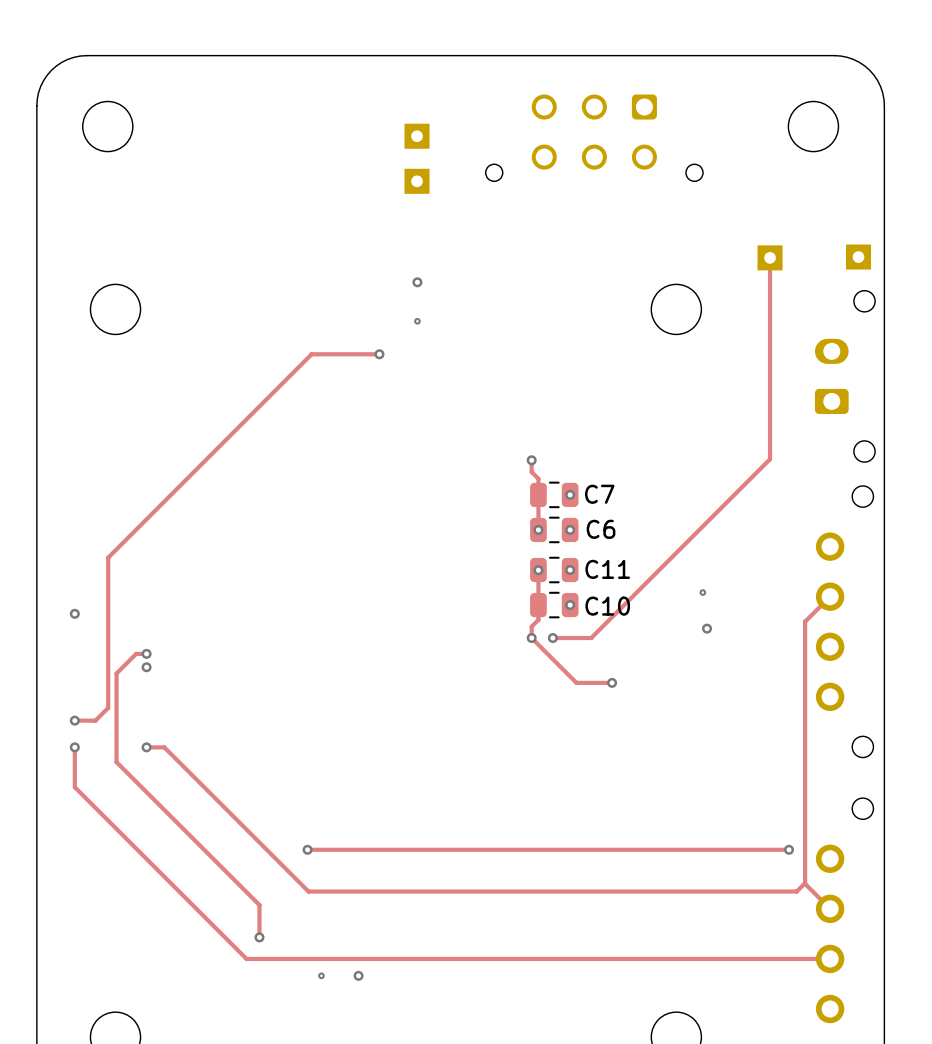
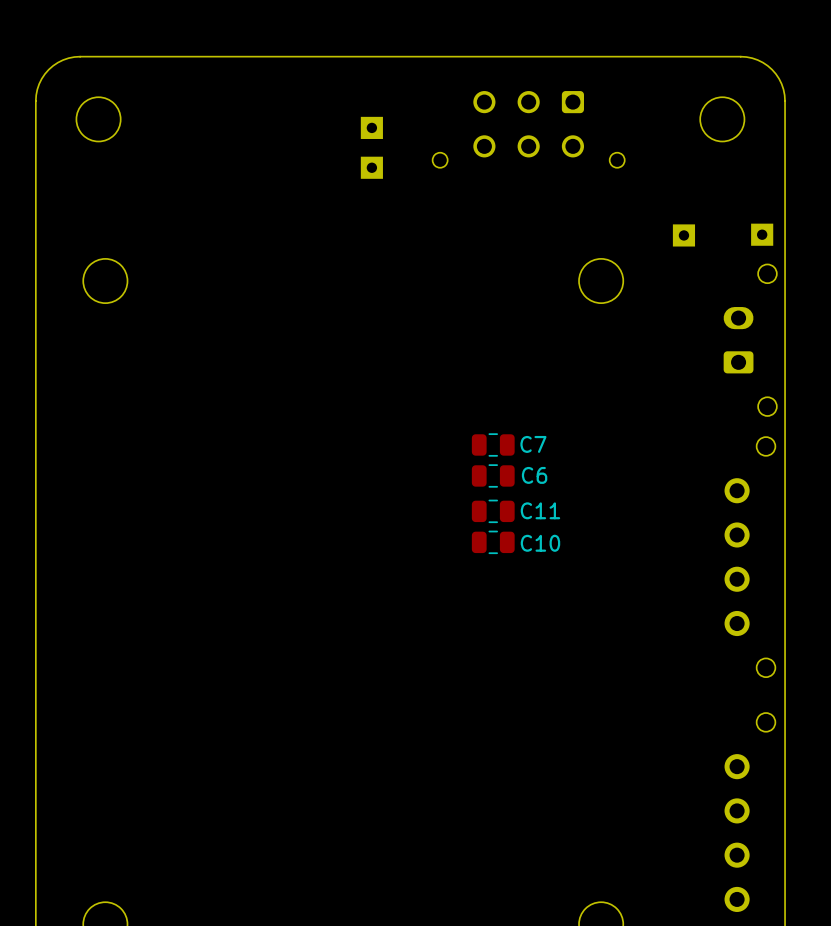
track: (770, 257) (770, 459) (591, 638) (552, 638) -> none
via: (417, 282) -> none
via: (417, 321) -> none
track: (379, 354) (311, 354) (108, 557) (108, 707) (95, 720) (74, 720) -> none
via: (379, 354) -> none
track: (531, 460) (531, 472) (538, 478) (538, 529) -> none
via: (531, 460) -> none
via: (570, 494) -> none
via: (538, 529) -> none
via: (570, 529) -> none
track: (538, 570) (538, 619) (531, 626) (531, 638) (576, 682) (612, 682) -> none
via: (538, 570) -> none
via: (570, 570) -> none
via: (702, 592) -> none
track: (830, 596) (805, 621) (805, 883) -> none
via: (570, 605) -> none
via: (74, 613) -> none
via: (707, 628) -> none
via: (531, 638) -> none
via: (552, 638) -> none
track: (146, 653) (136, 653) (116, 673) (116, 762) (259, 905) (259, 937) -> none
via: (146, 653) -> none
via: (146, 667) -> none
via: (612, 682) -> none
via: (74, 720) -> none
track: (74, 747) (74, 787) (246, 958) (830, 958) -> none
via: (74, 747) -> none
track: (146, 747) (164, 747) (308, 891) (796, 891) (805, 883) -> none
via: (146, 747) -> none
track: (307, 849) (789, 849) -> none
via: (307, 849) -> none
via: (789, 849) -> none
track: (805, 883) (830, 908) -> none
via: (259, 937) -> none
via: (321, 975) -> none
via: (358, 975) -> none

